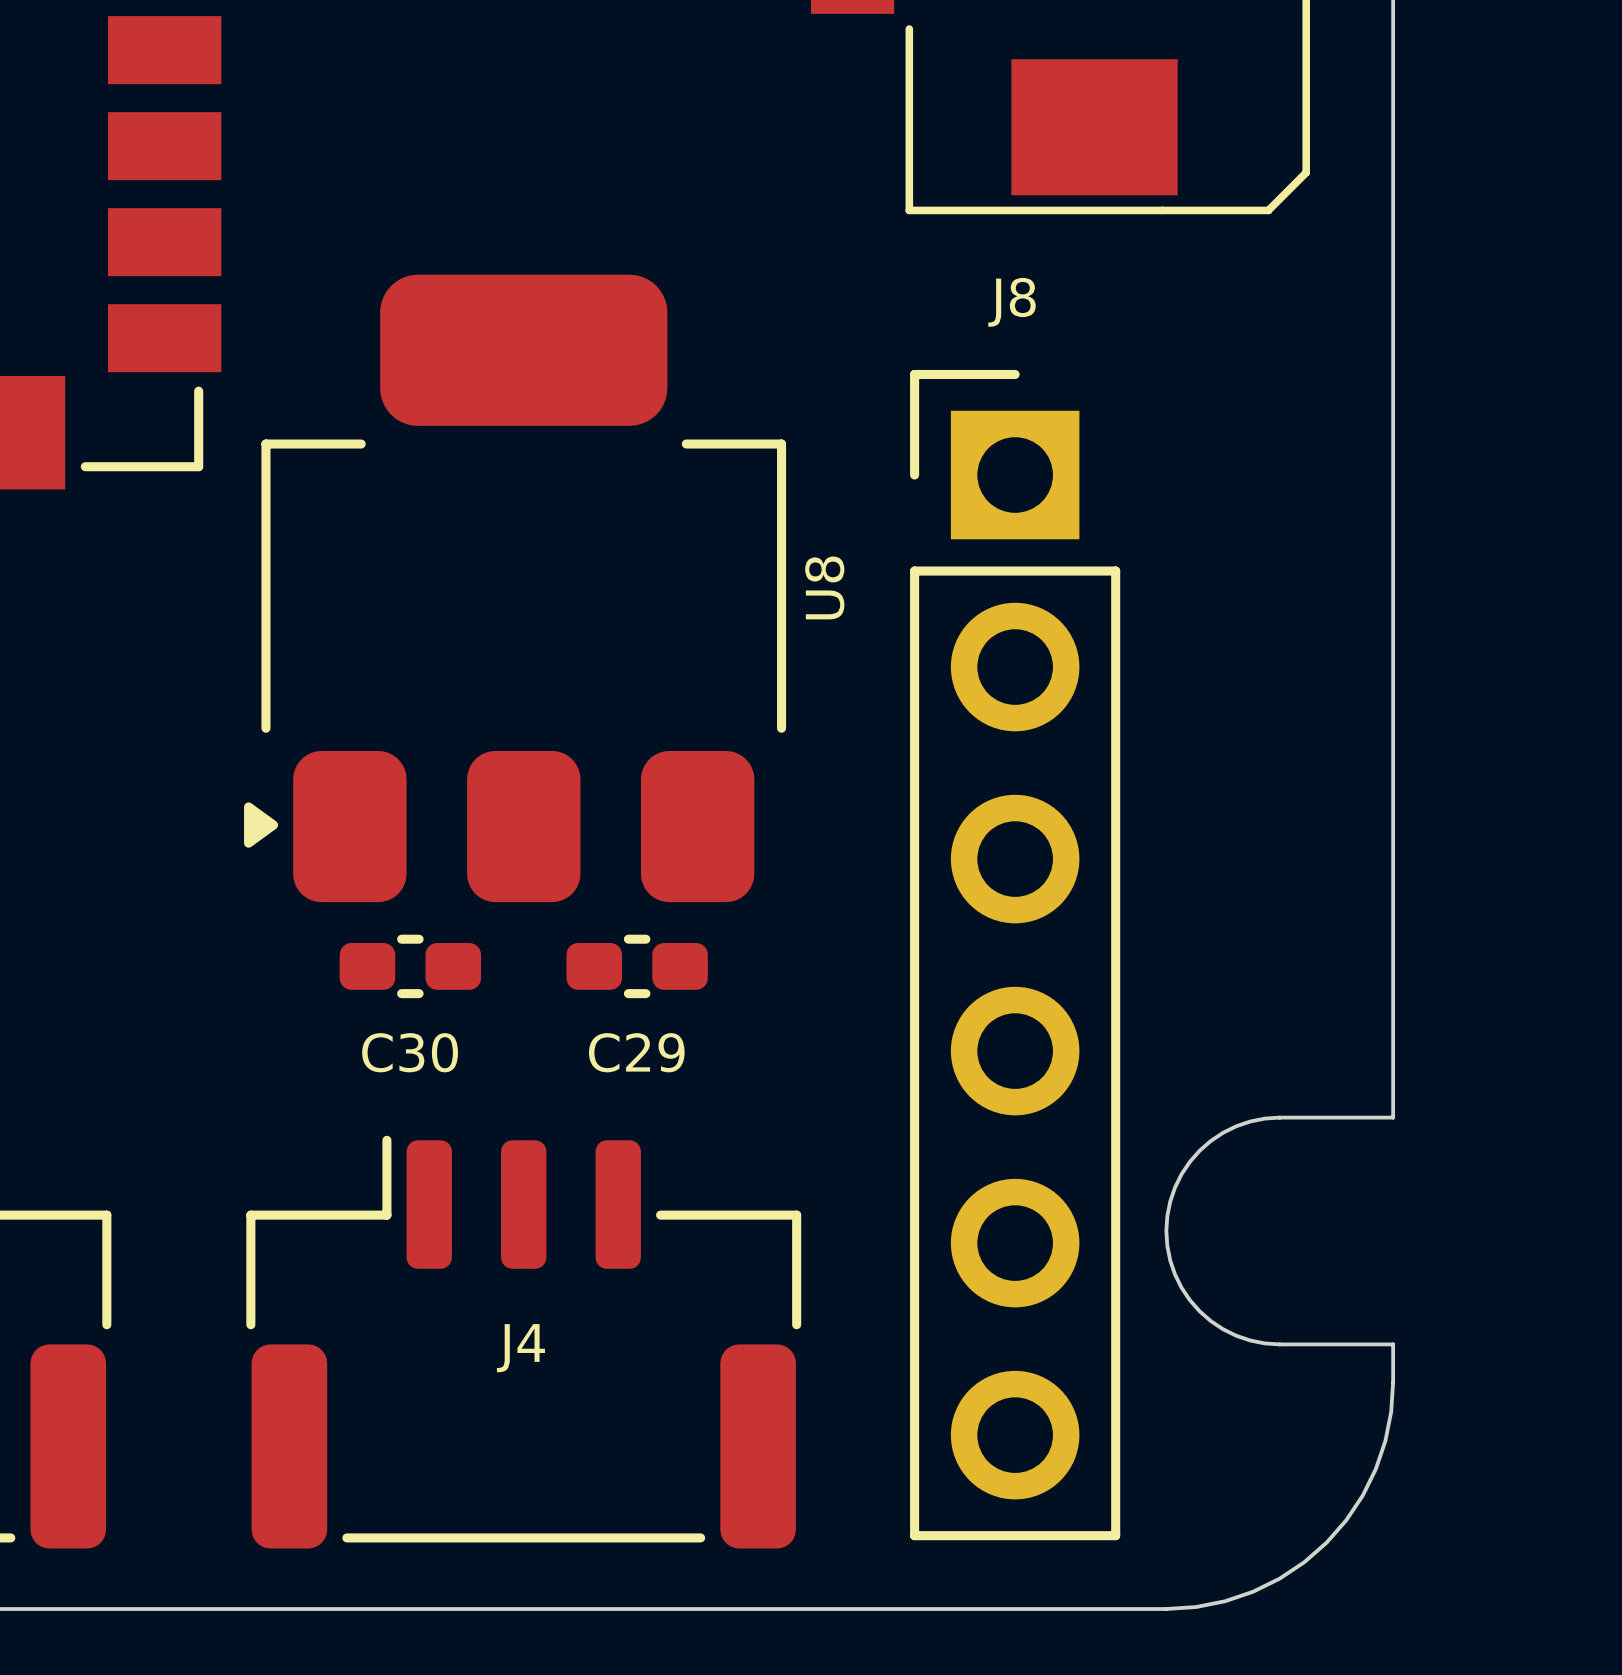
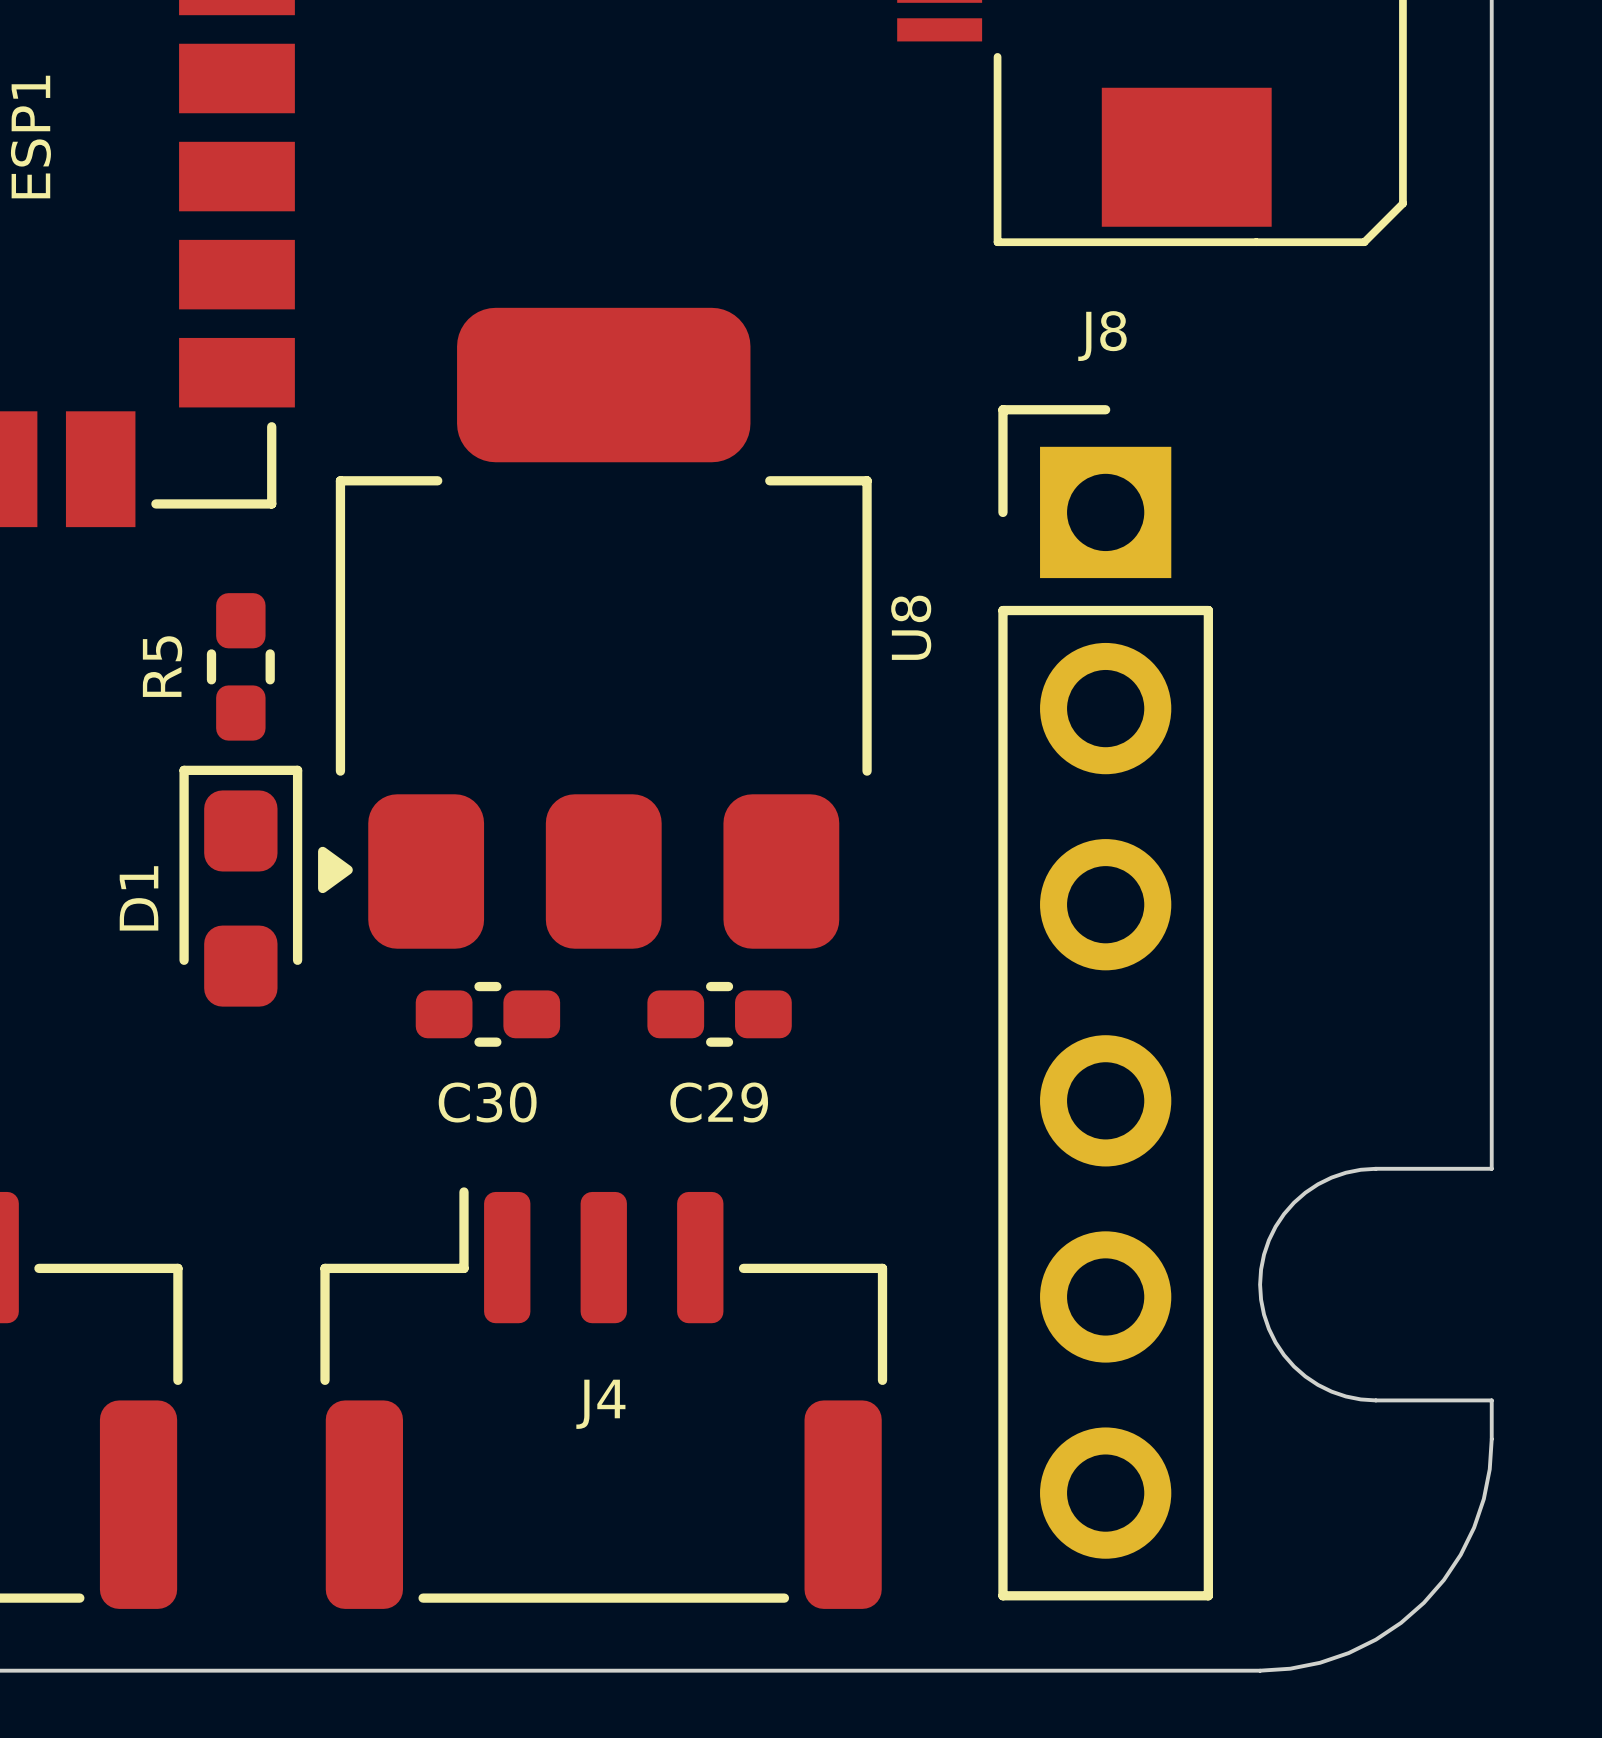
R5: none -> (240, 666)
D1: none -> (240, 886)

